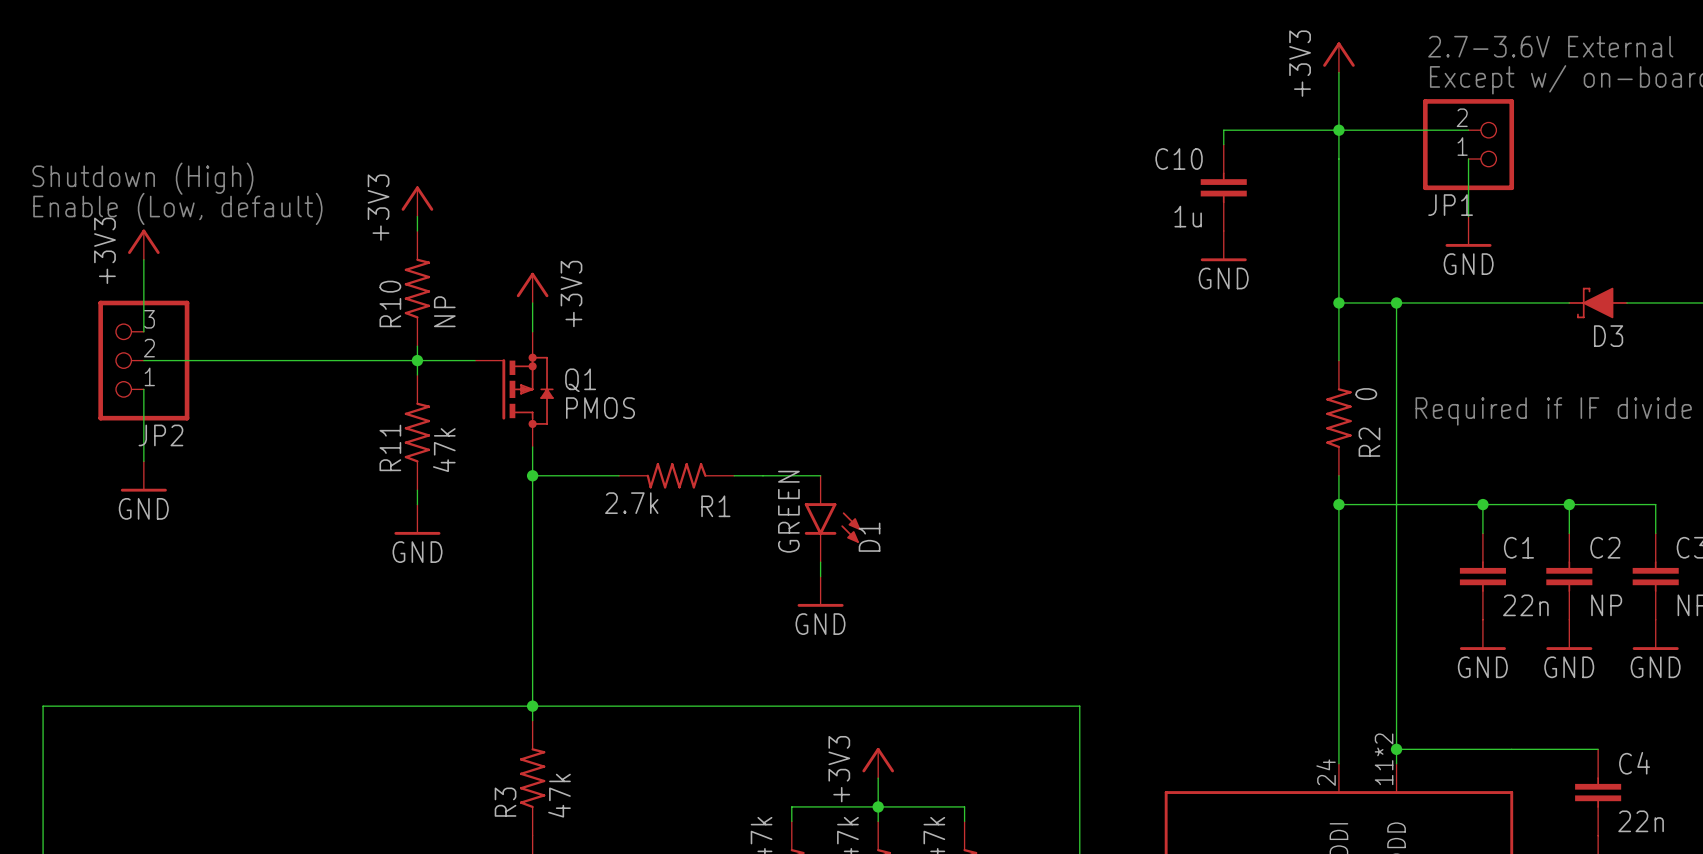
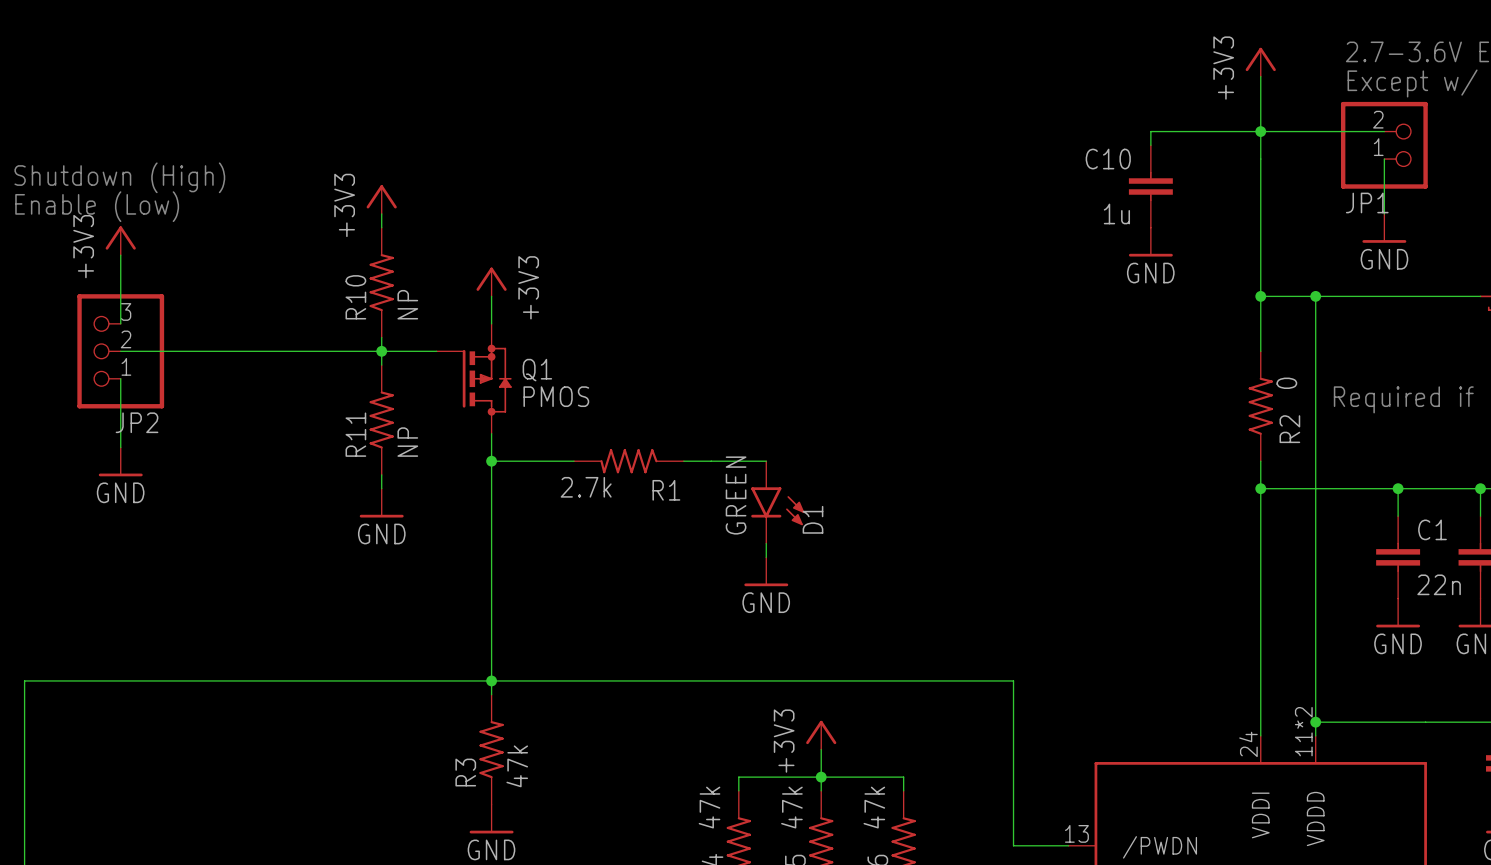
text: Enable (Low, default) (177, 208) -> Enable (Low) (97, 206)
R11 value: 47k (444, 450) -> NP (407, 442)

